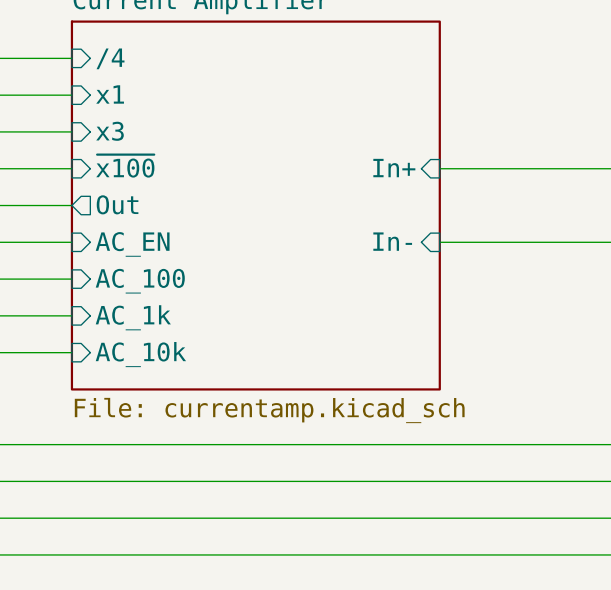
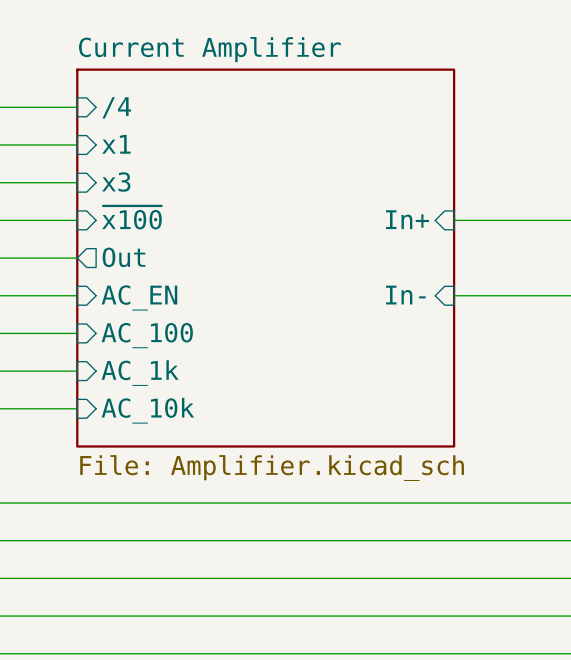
sheet Current Amplifier value: File: currentamp.kicad_sch (269, 410) -> File: Amplifier.kicad_sch (272, 468)

